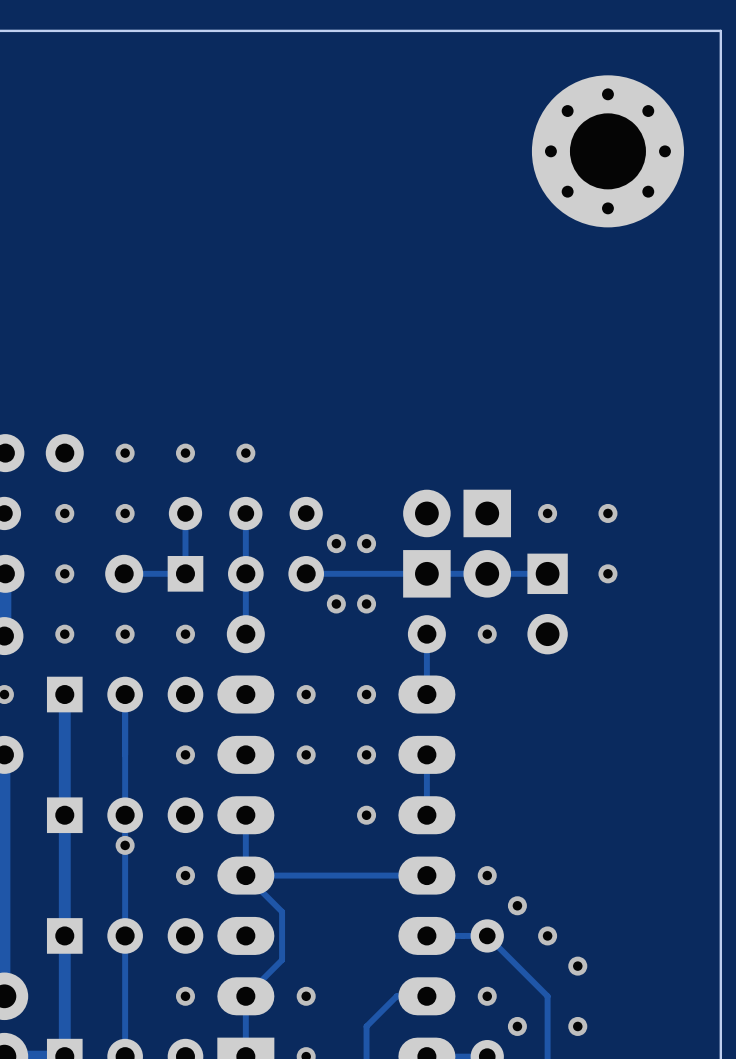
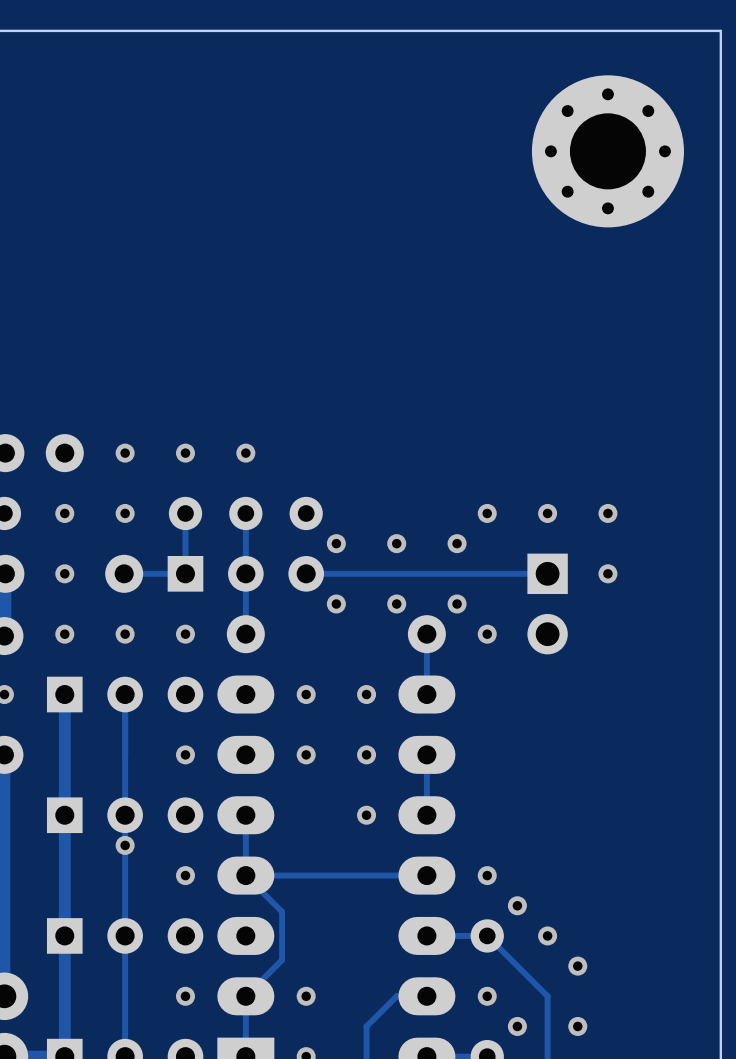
via: none -> (487, 513)
via position: (366, 543) -> (396, 543)
part: (426, 543) -> none
via: none -> (457, 543)
part: (487, 543) -> none
via position: (366, 604) -> (396, 604)
via: none -> (457, 604)

